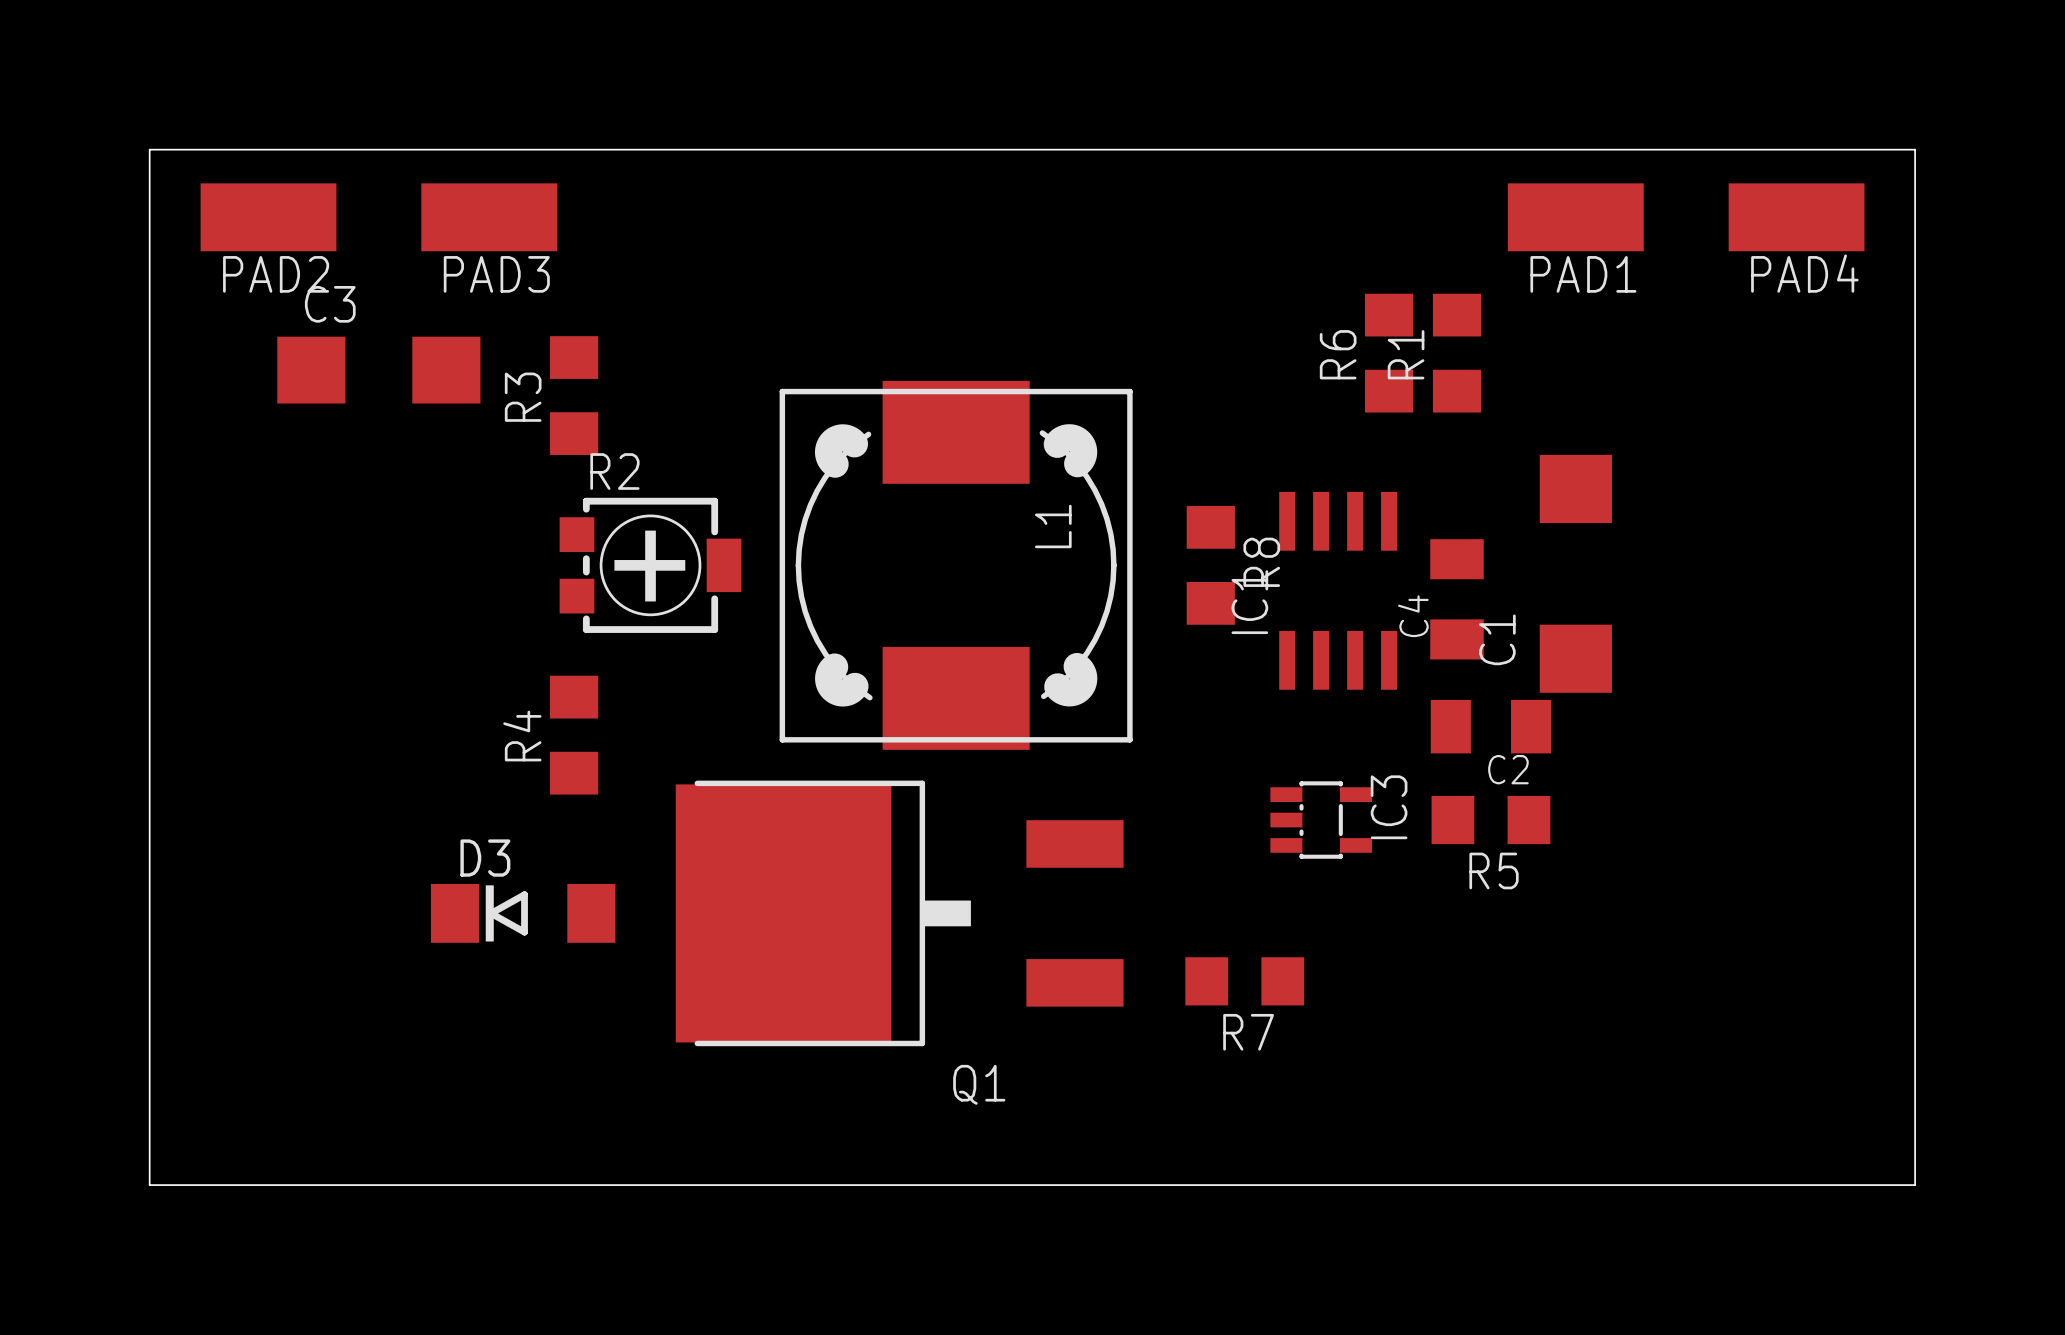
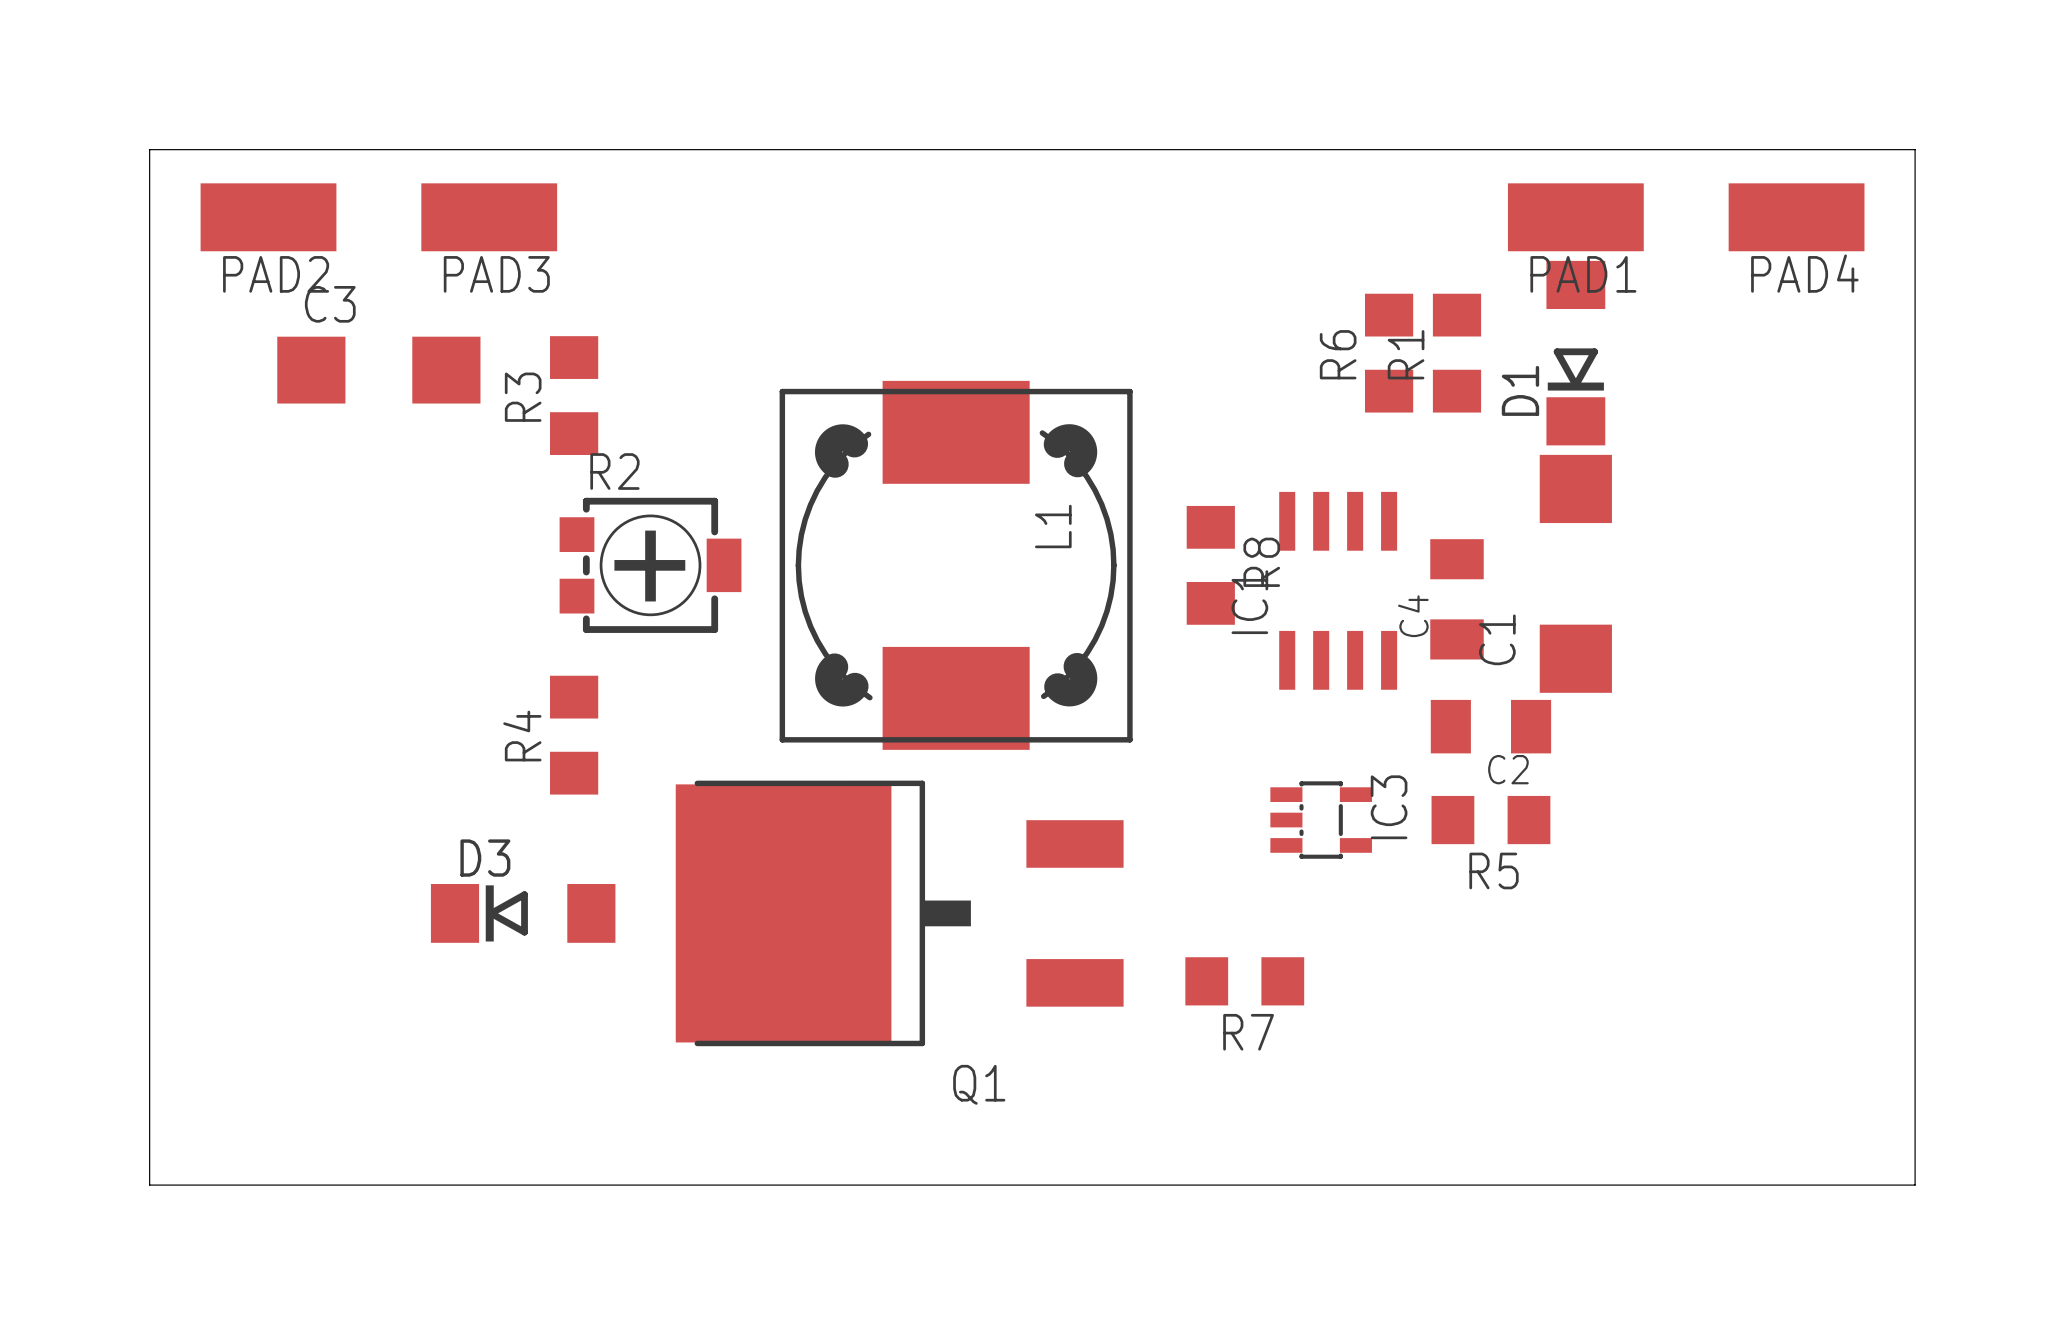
D1: none -> (1575, 353)

